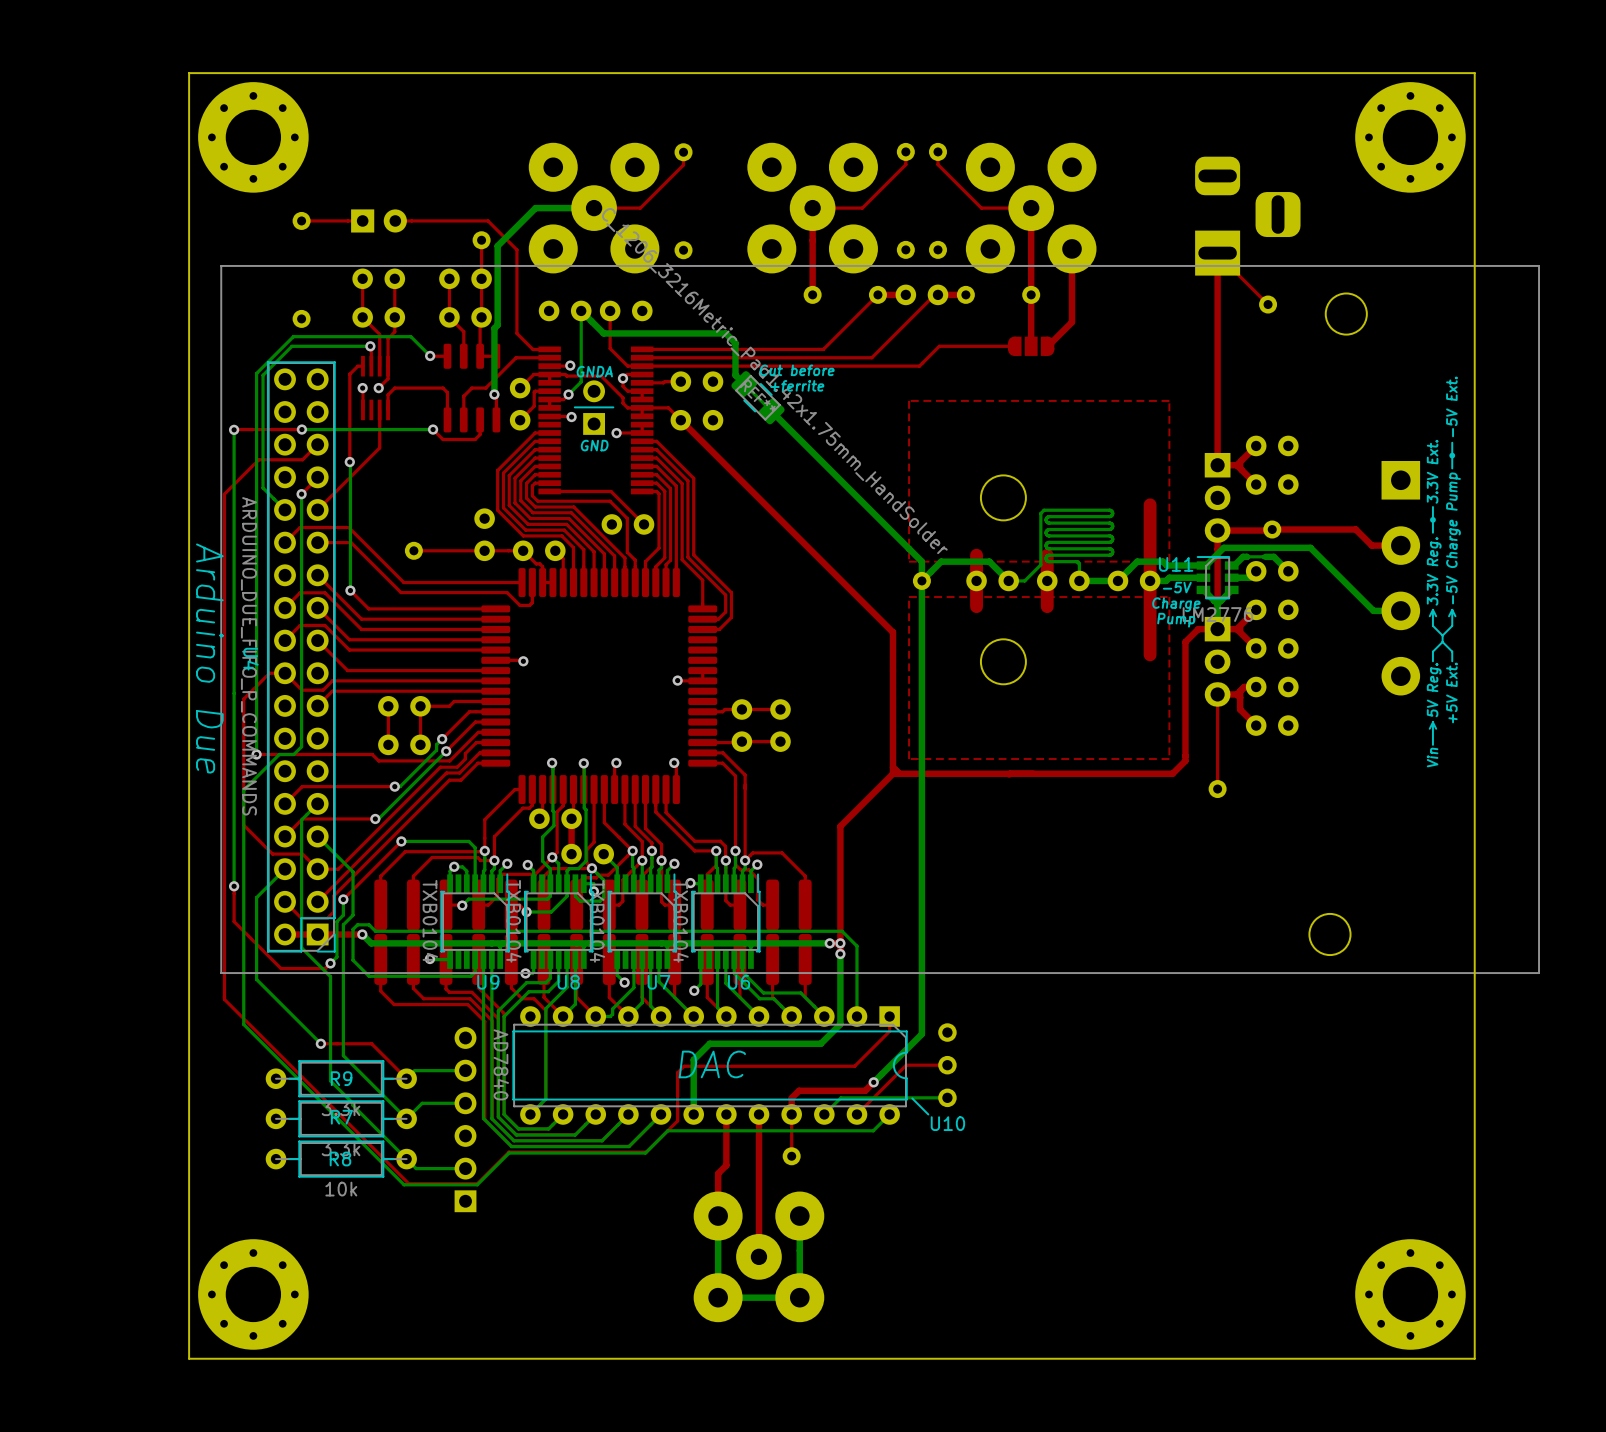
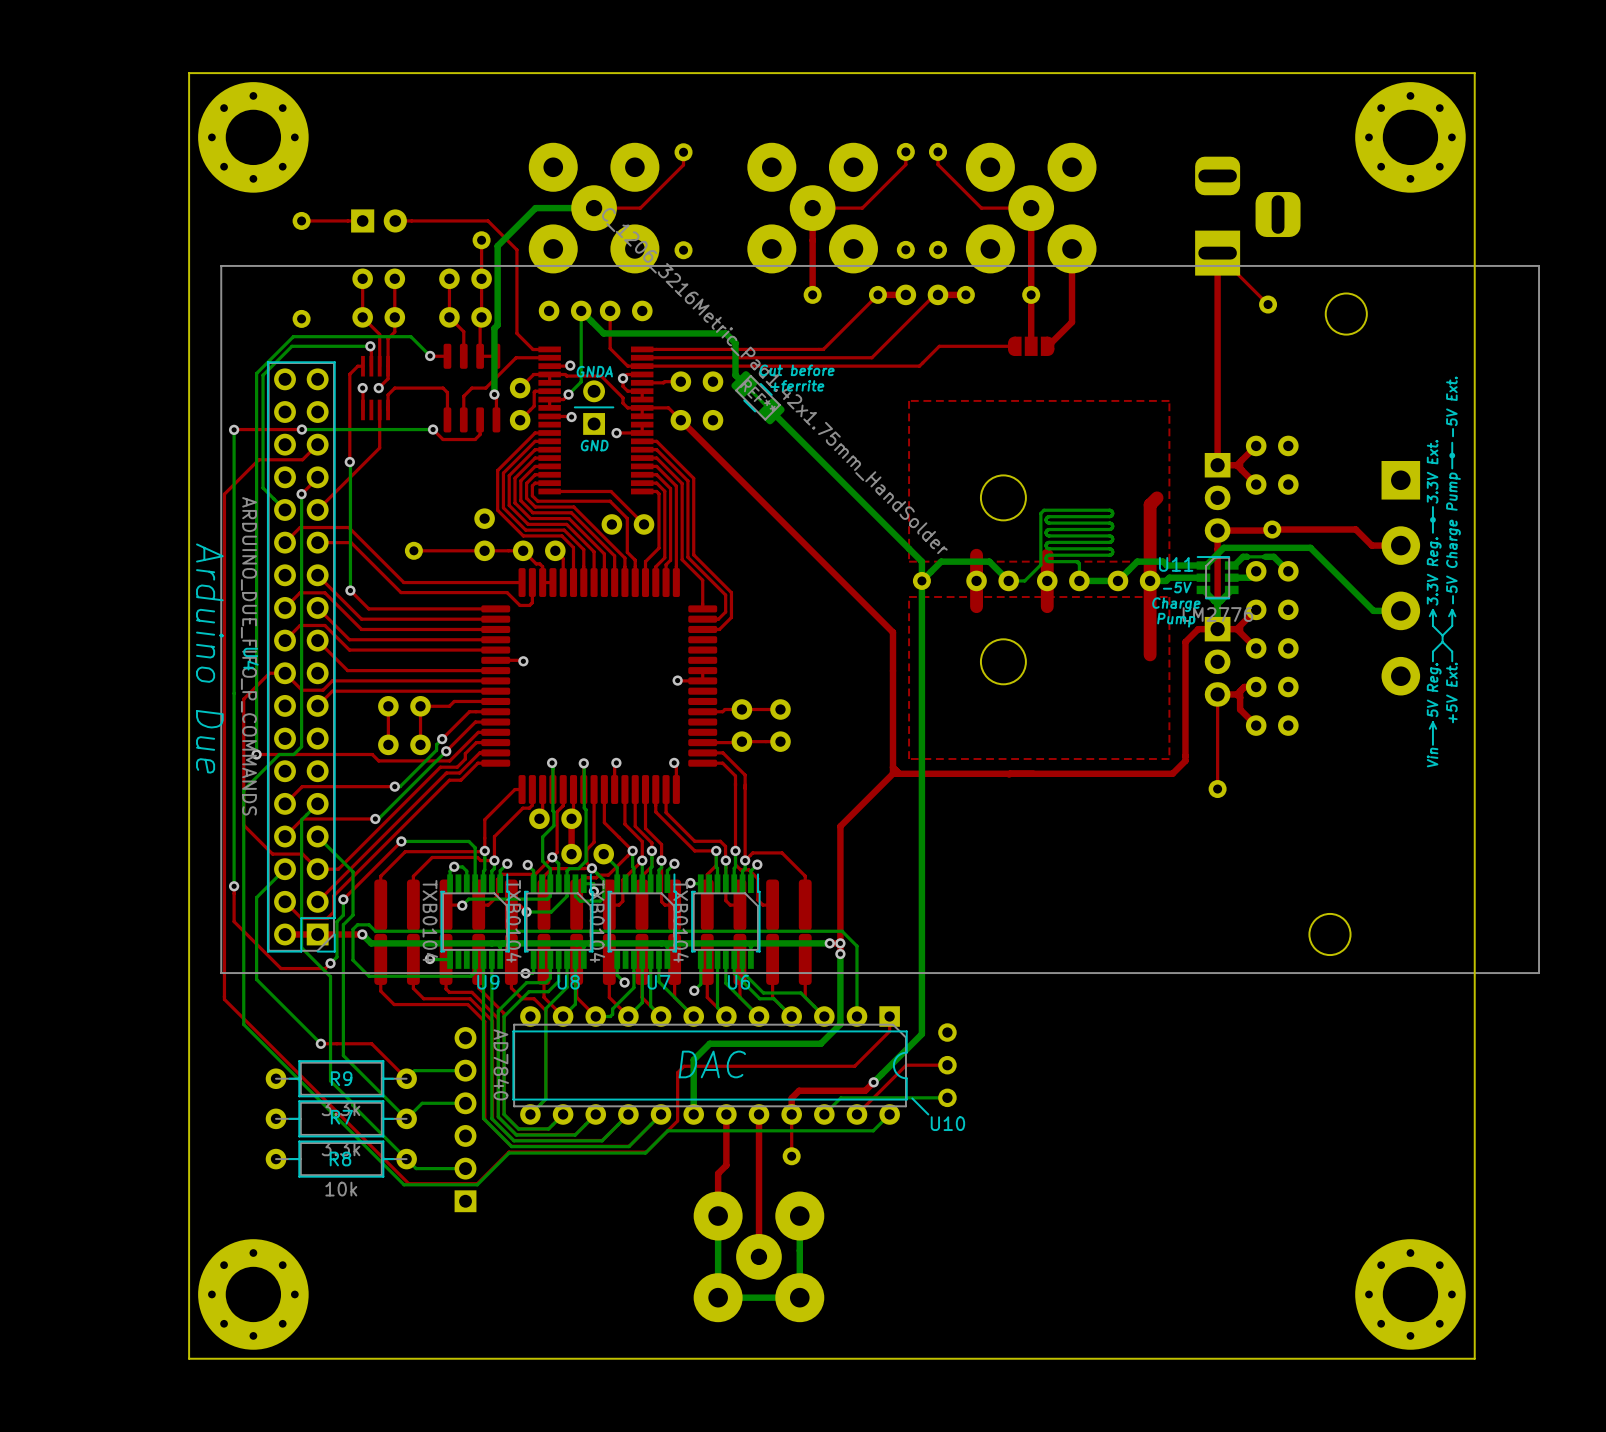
top track: none -> (1157, 497) (1150, 504)

